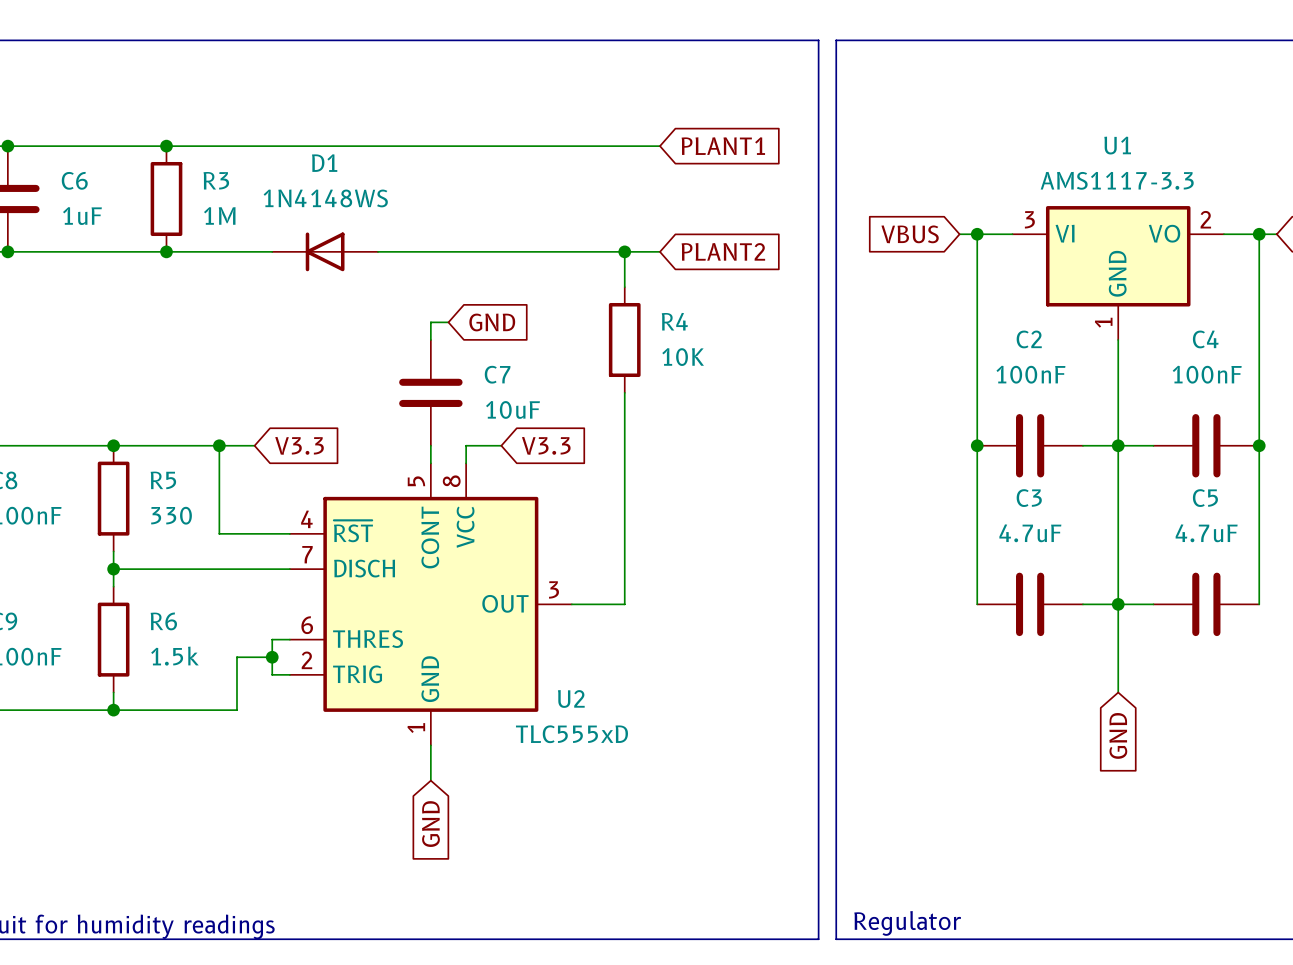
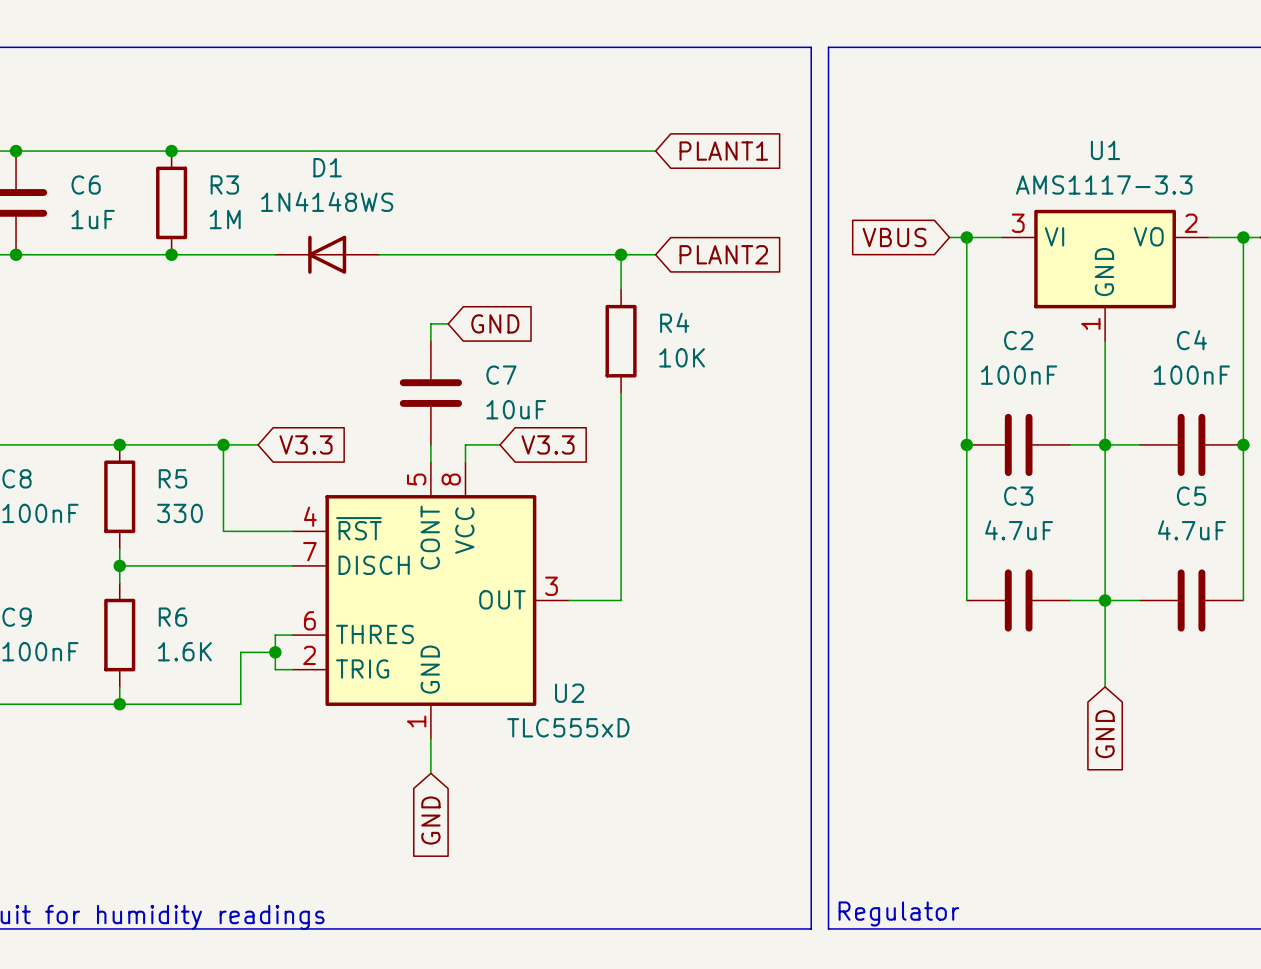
R6 value: 1.5k (174, 656) -> 1.6K (184, 651)

